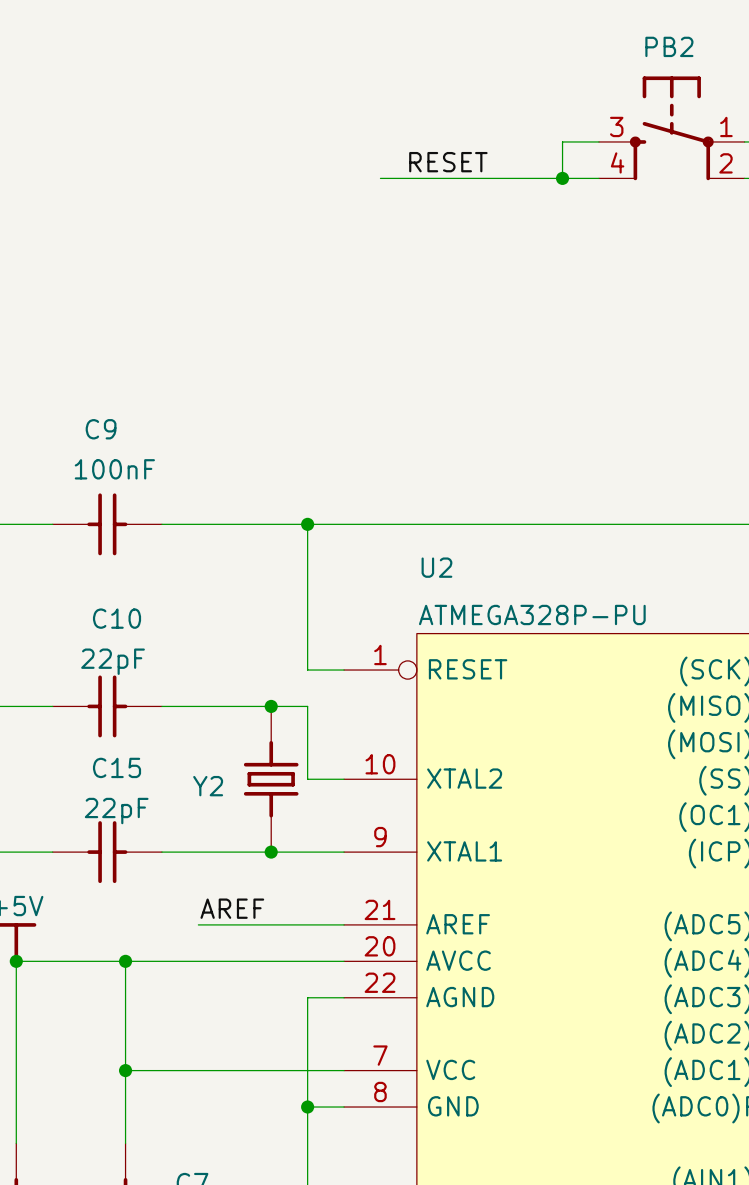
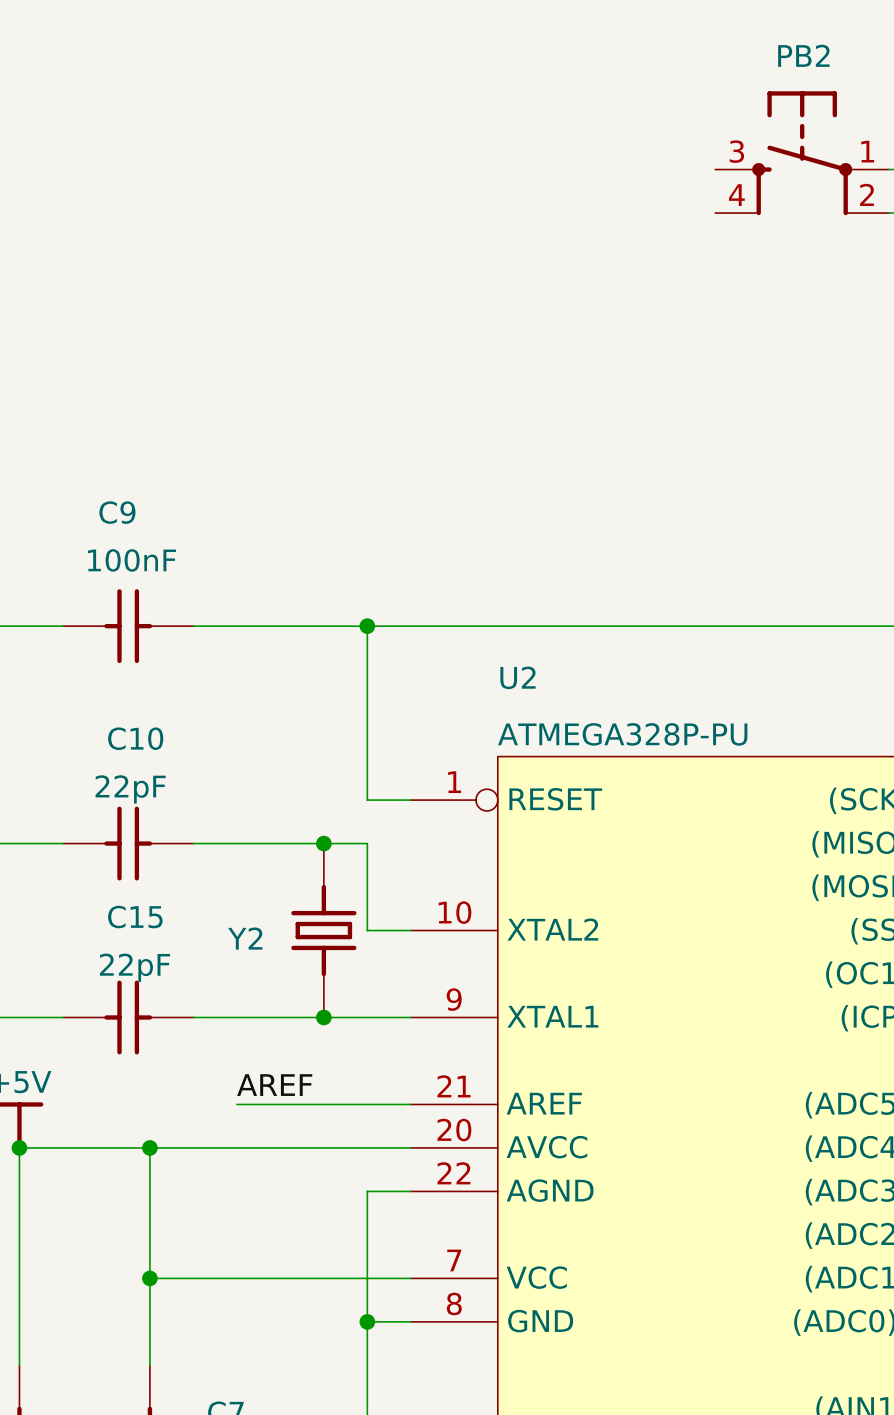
wire: (598, 141) (562, 141) (562, 178) -> none
label: RESET (448, 162) -> none
wire: (380, 178) (598, 178) -> none
junction: (562, 178) -> none

